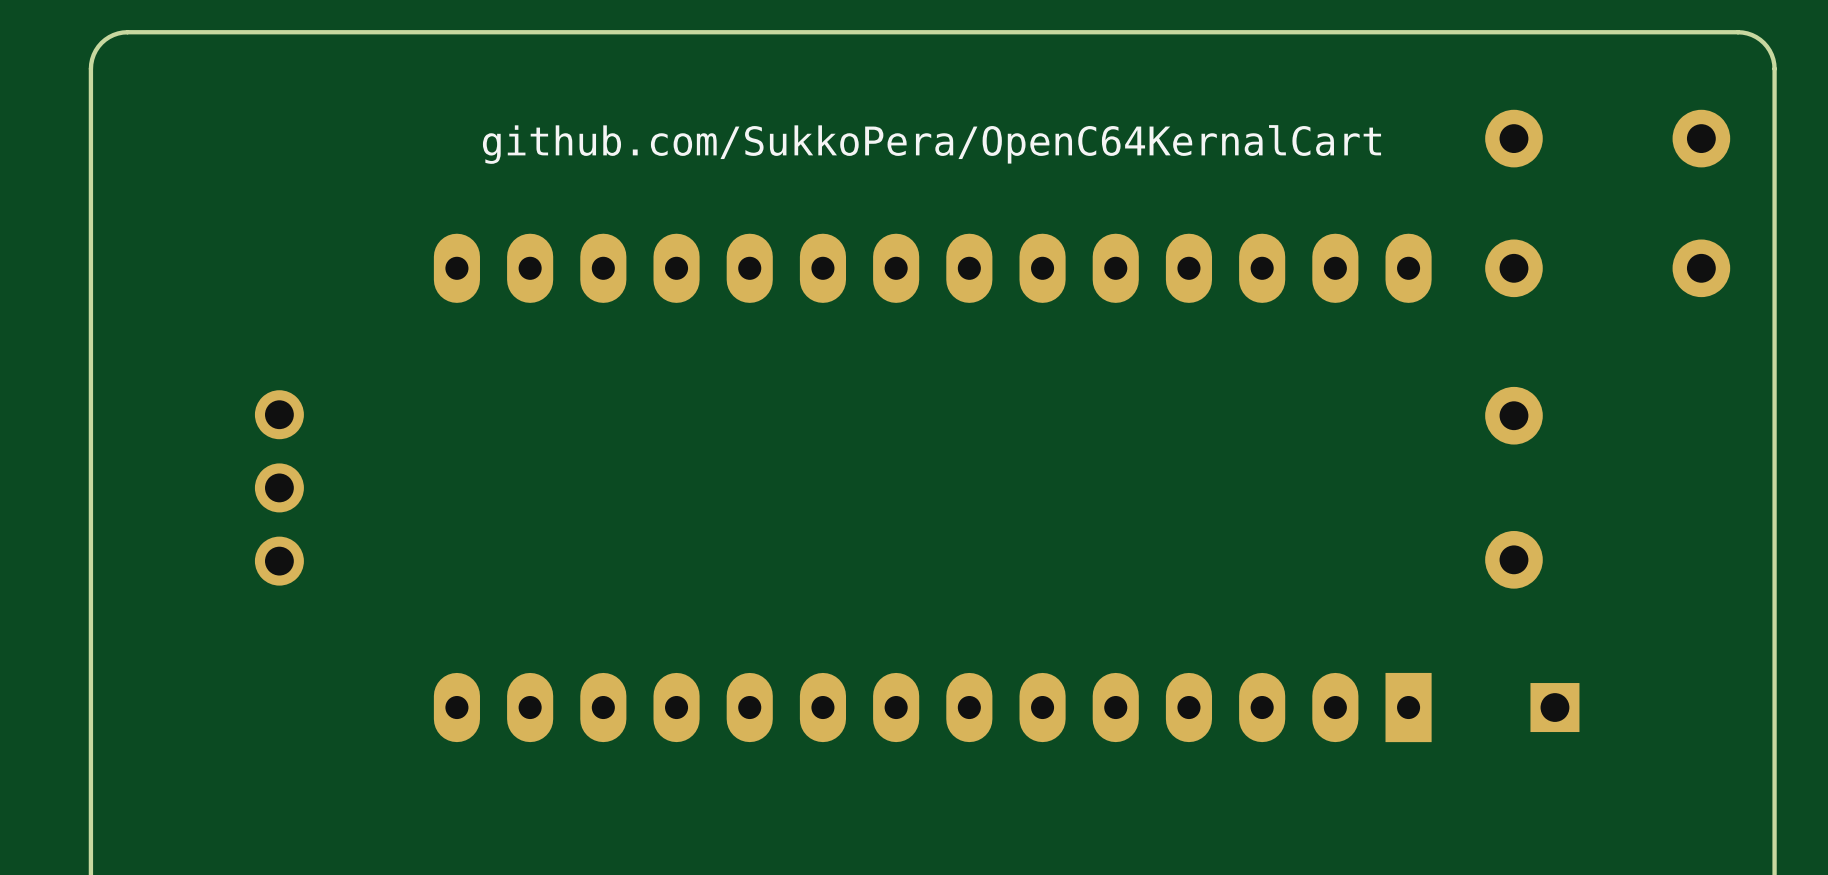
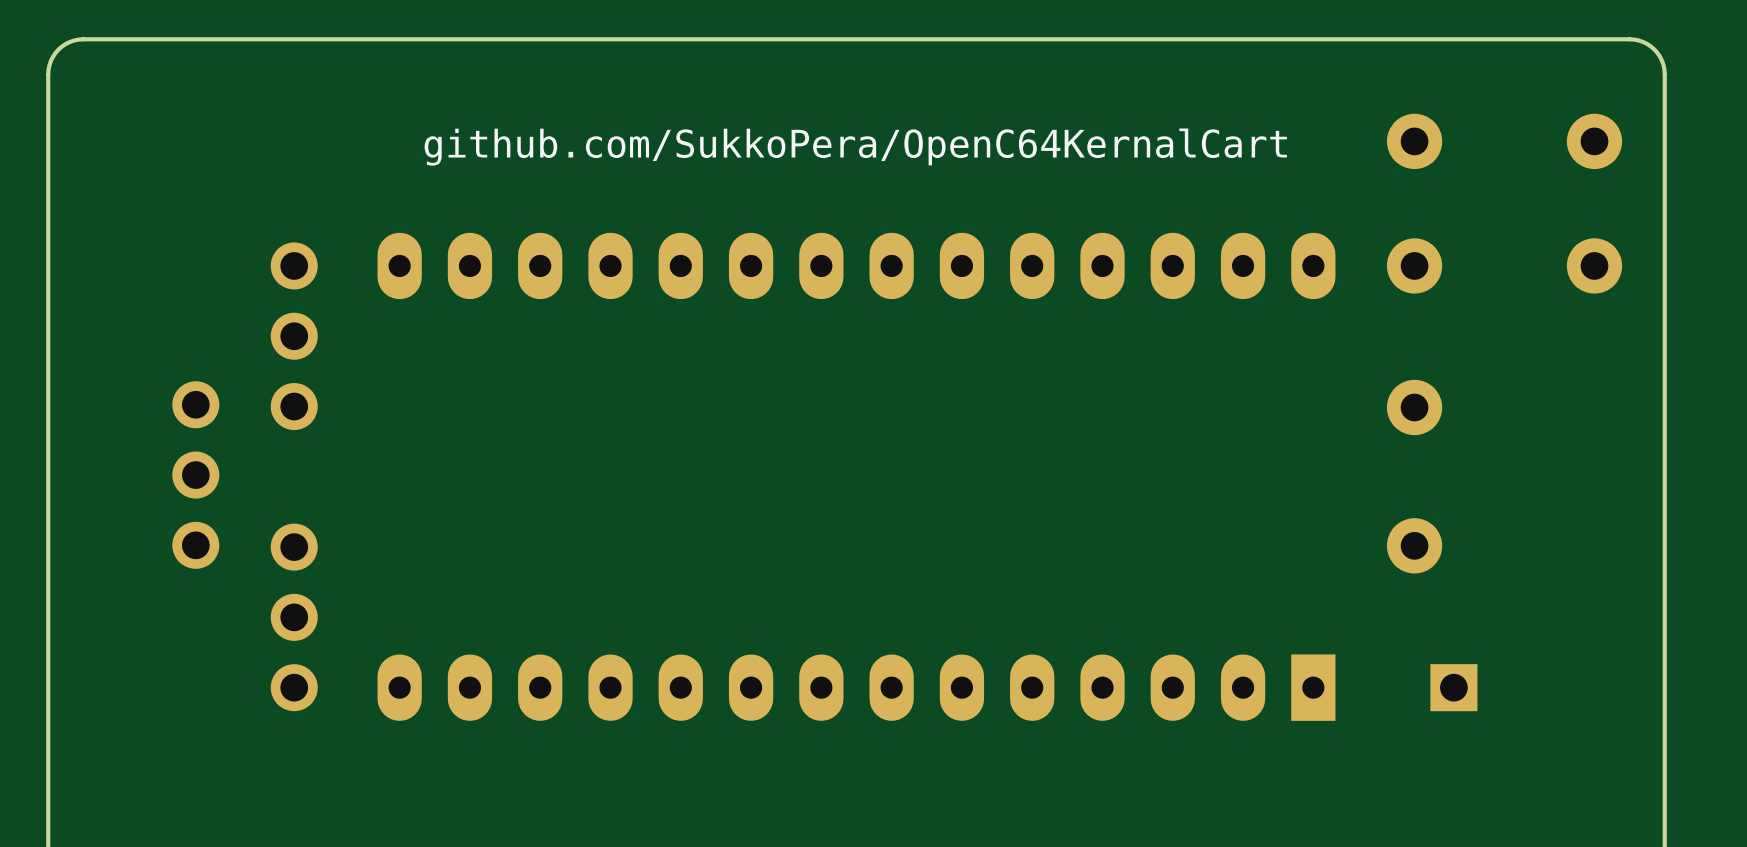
part: none -> (294, 336)
part position: (279, 487) -> (195, 475)
part: none -> (294, 617)

